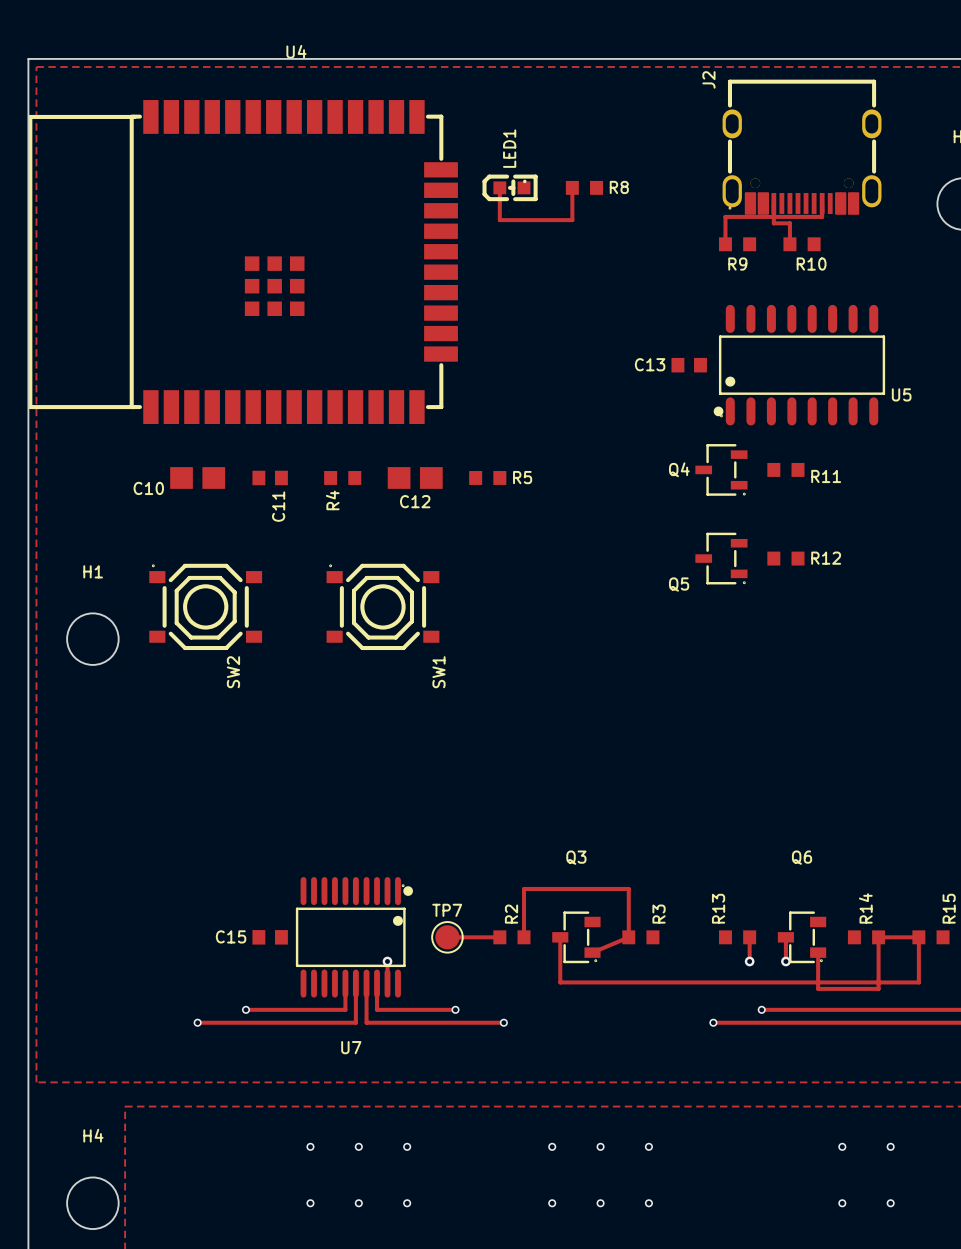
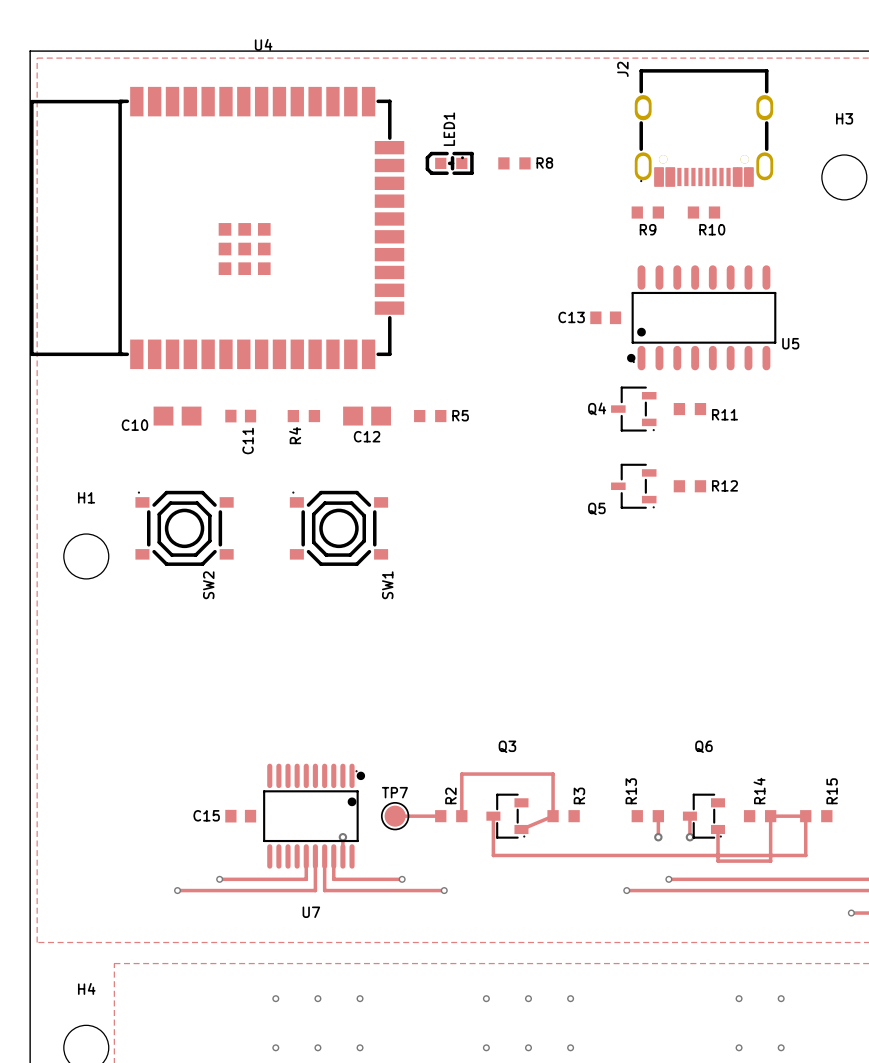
track: (499, 187) (499, 220) (572, 220) (572, 187) -> none
track: (773, 203) (773, 223) (789, 223) (789, 244) -> none
track: (822, 203) (822, 216) (725, 216) (725, 244) -> none

